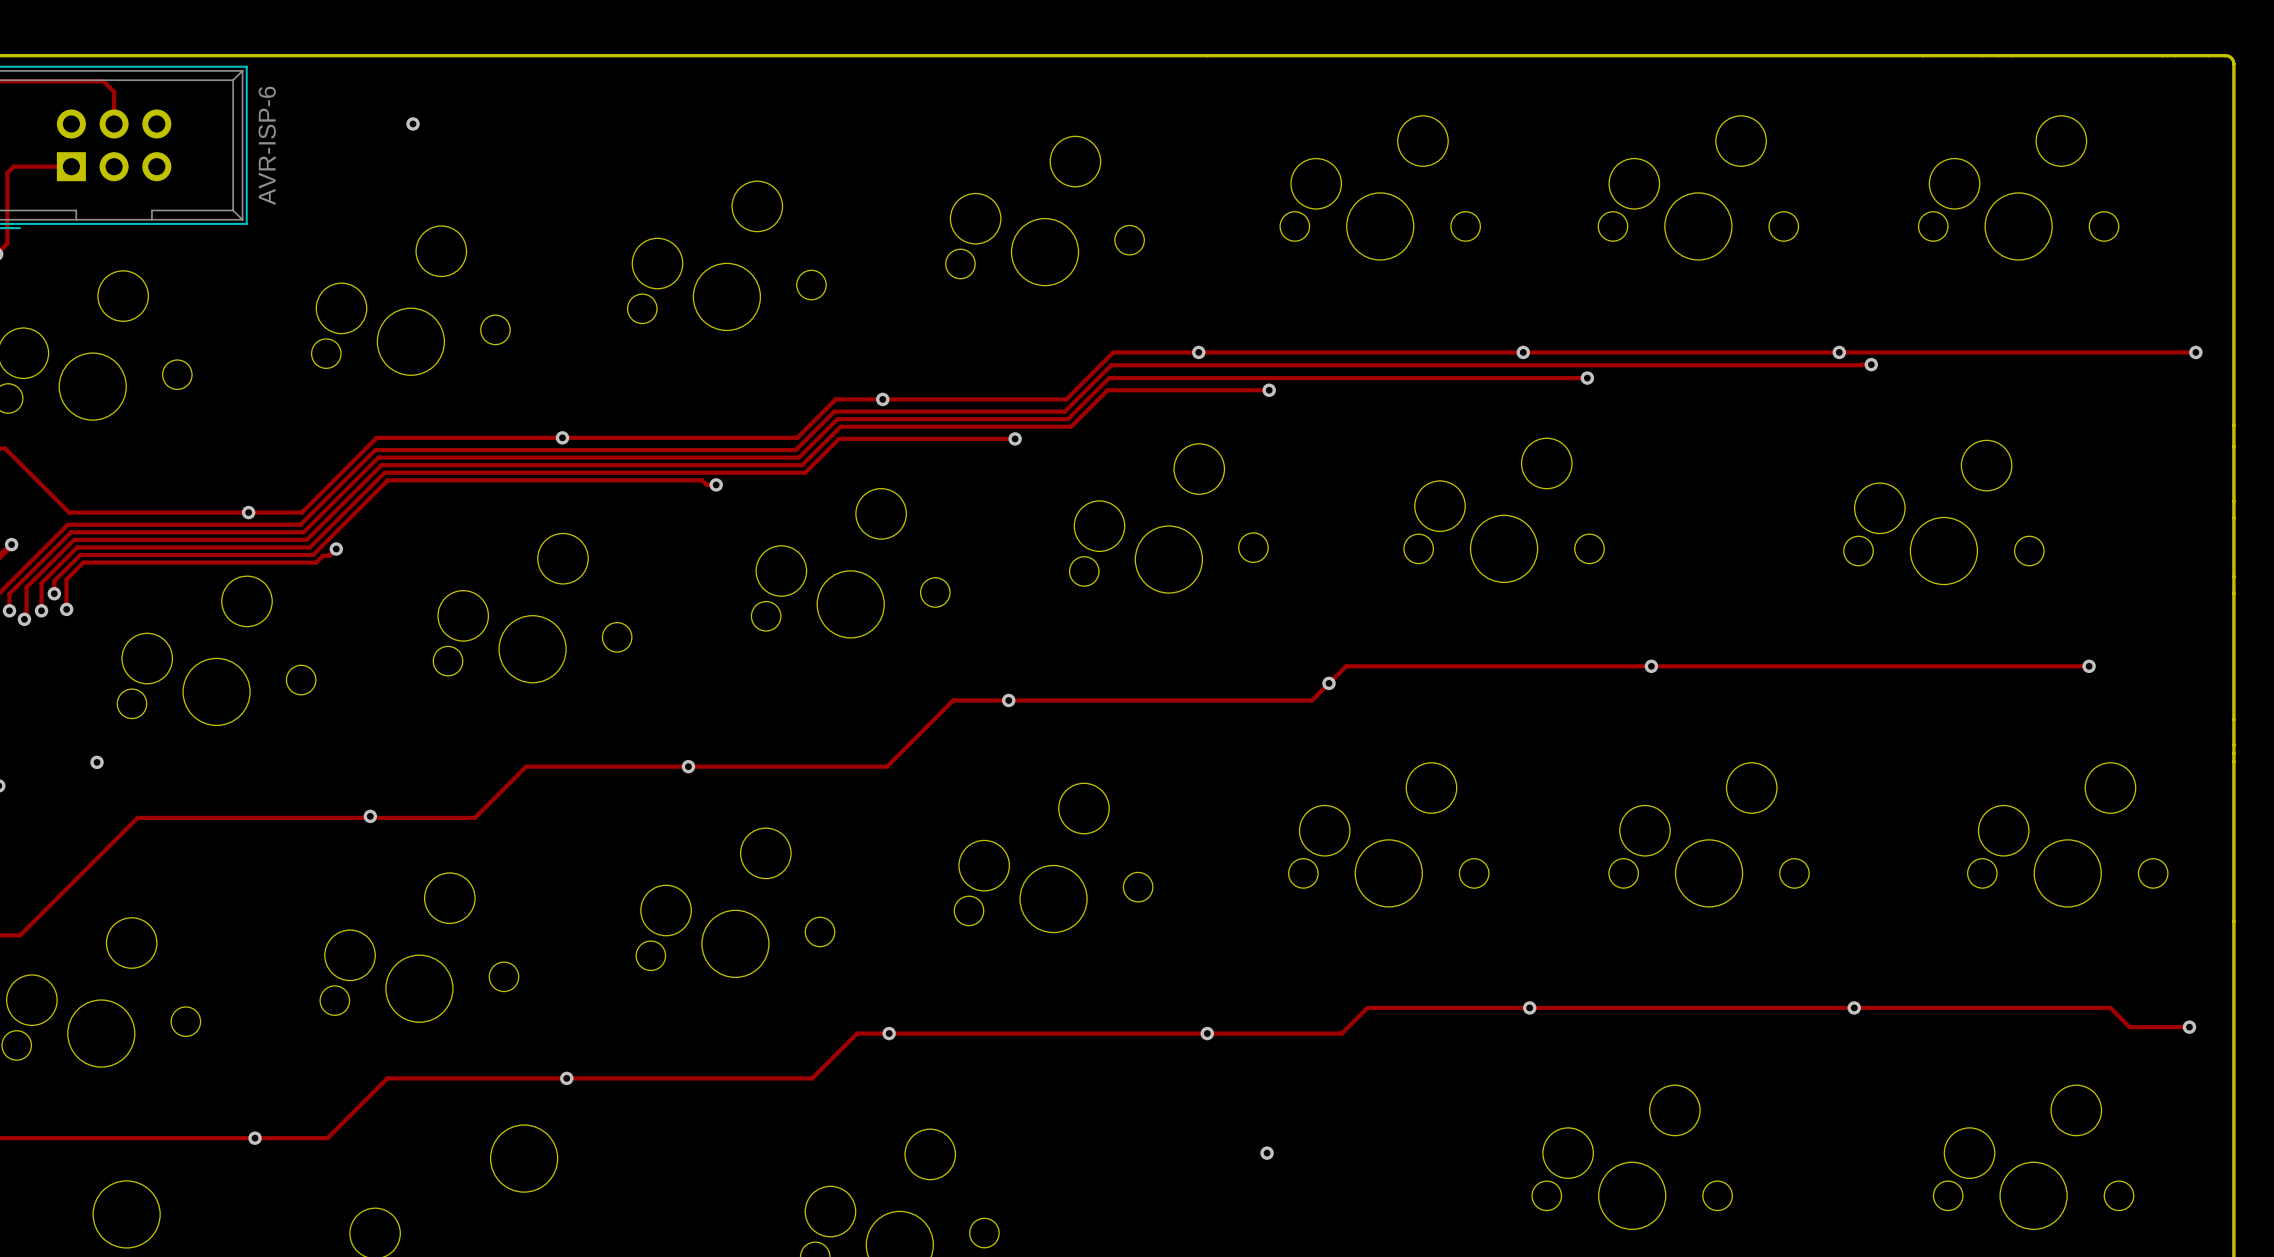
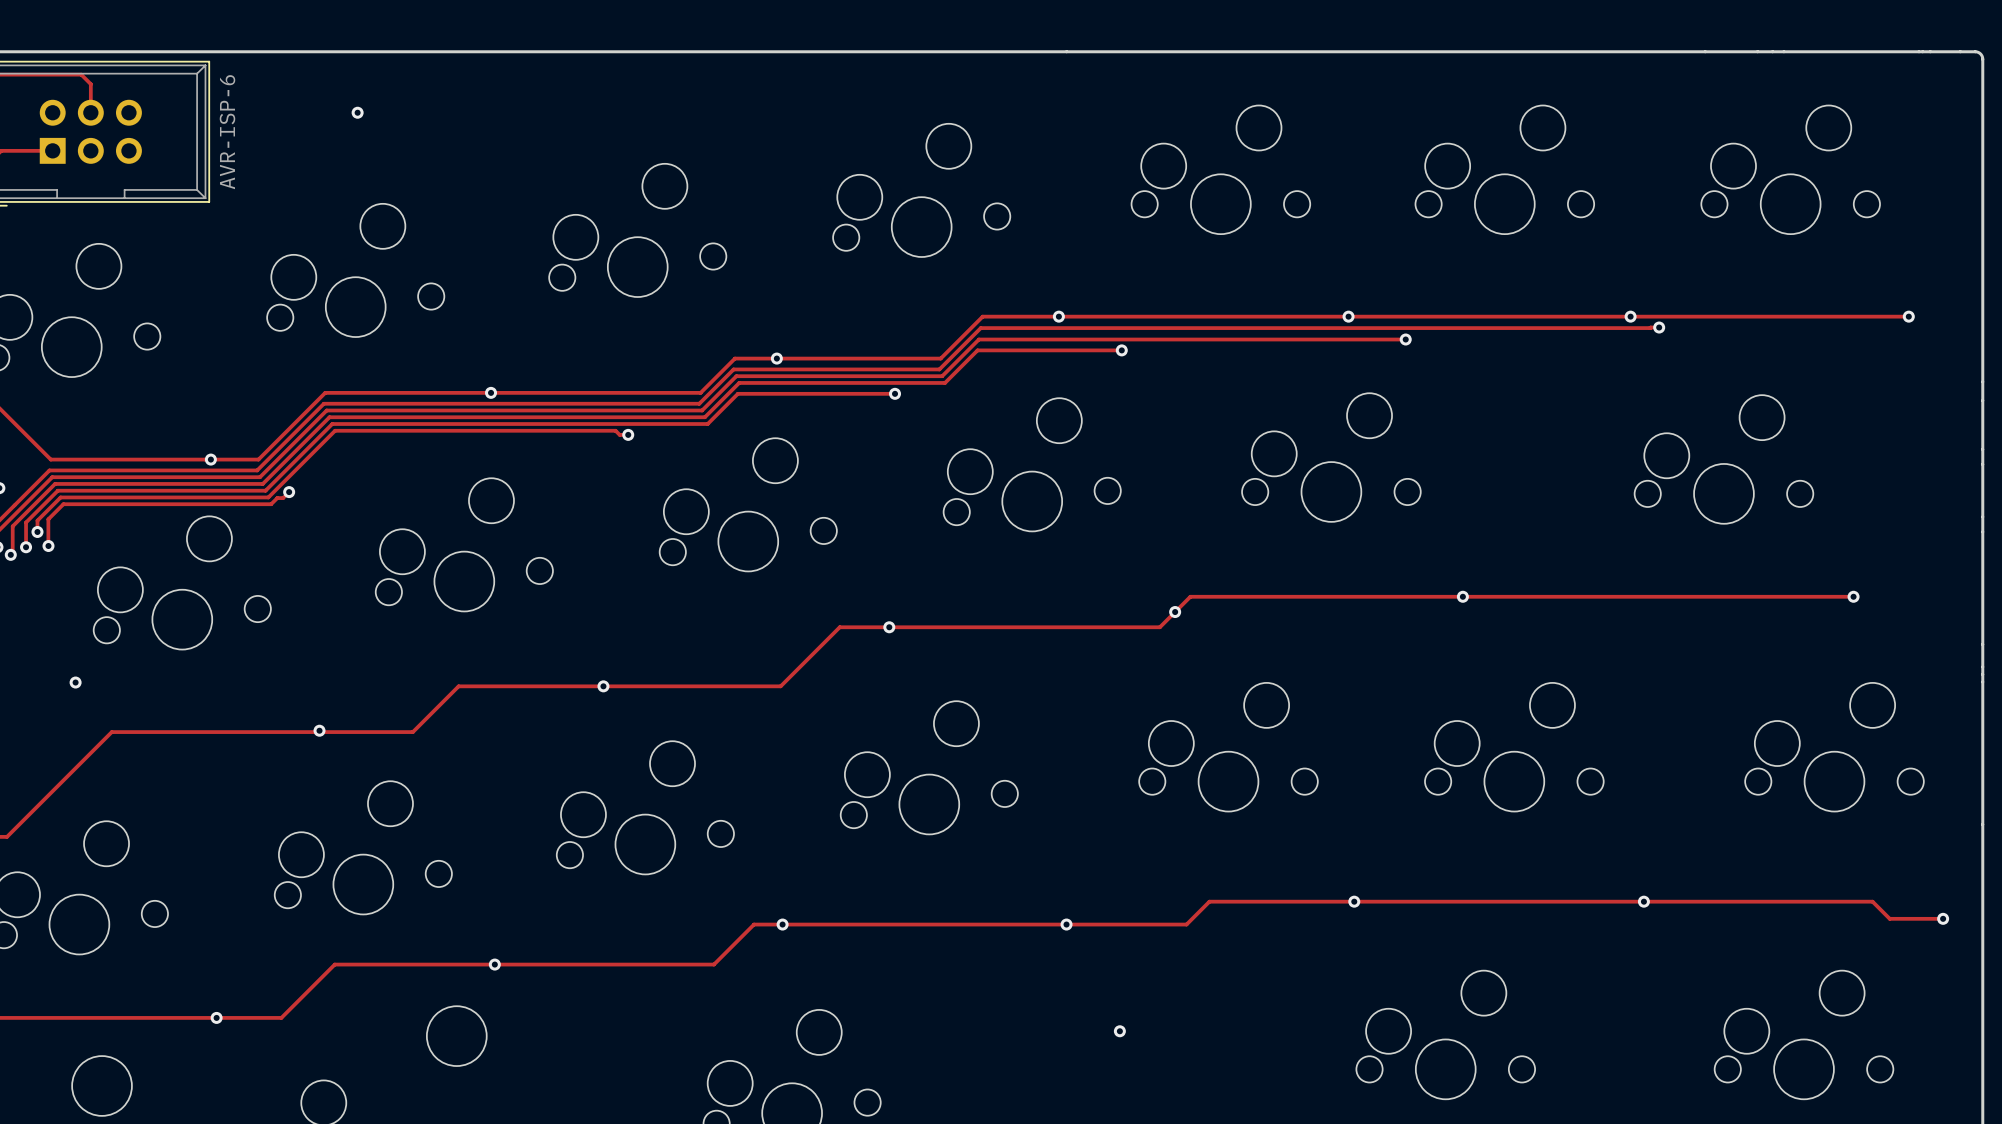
track: (2151, 352) (2195, 352) -> none
via position: (2195, 352) -> (1908, 316)

